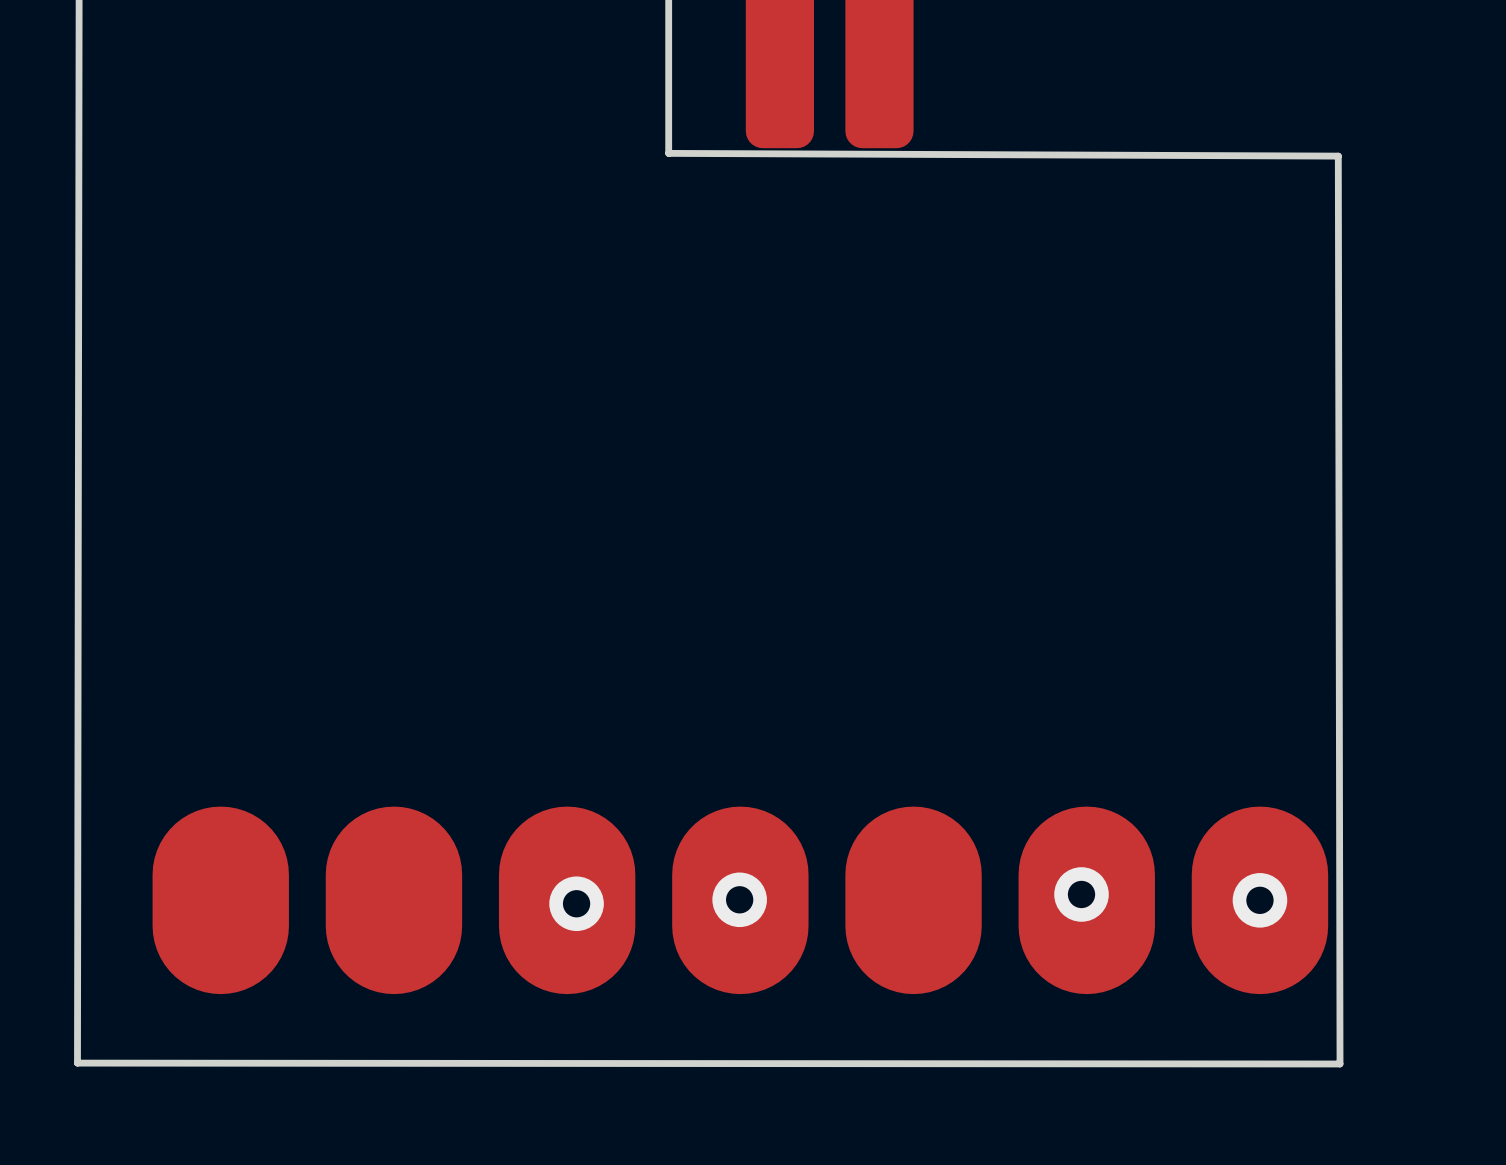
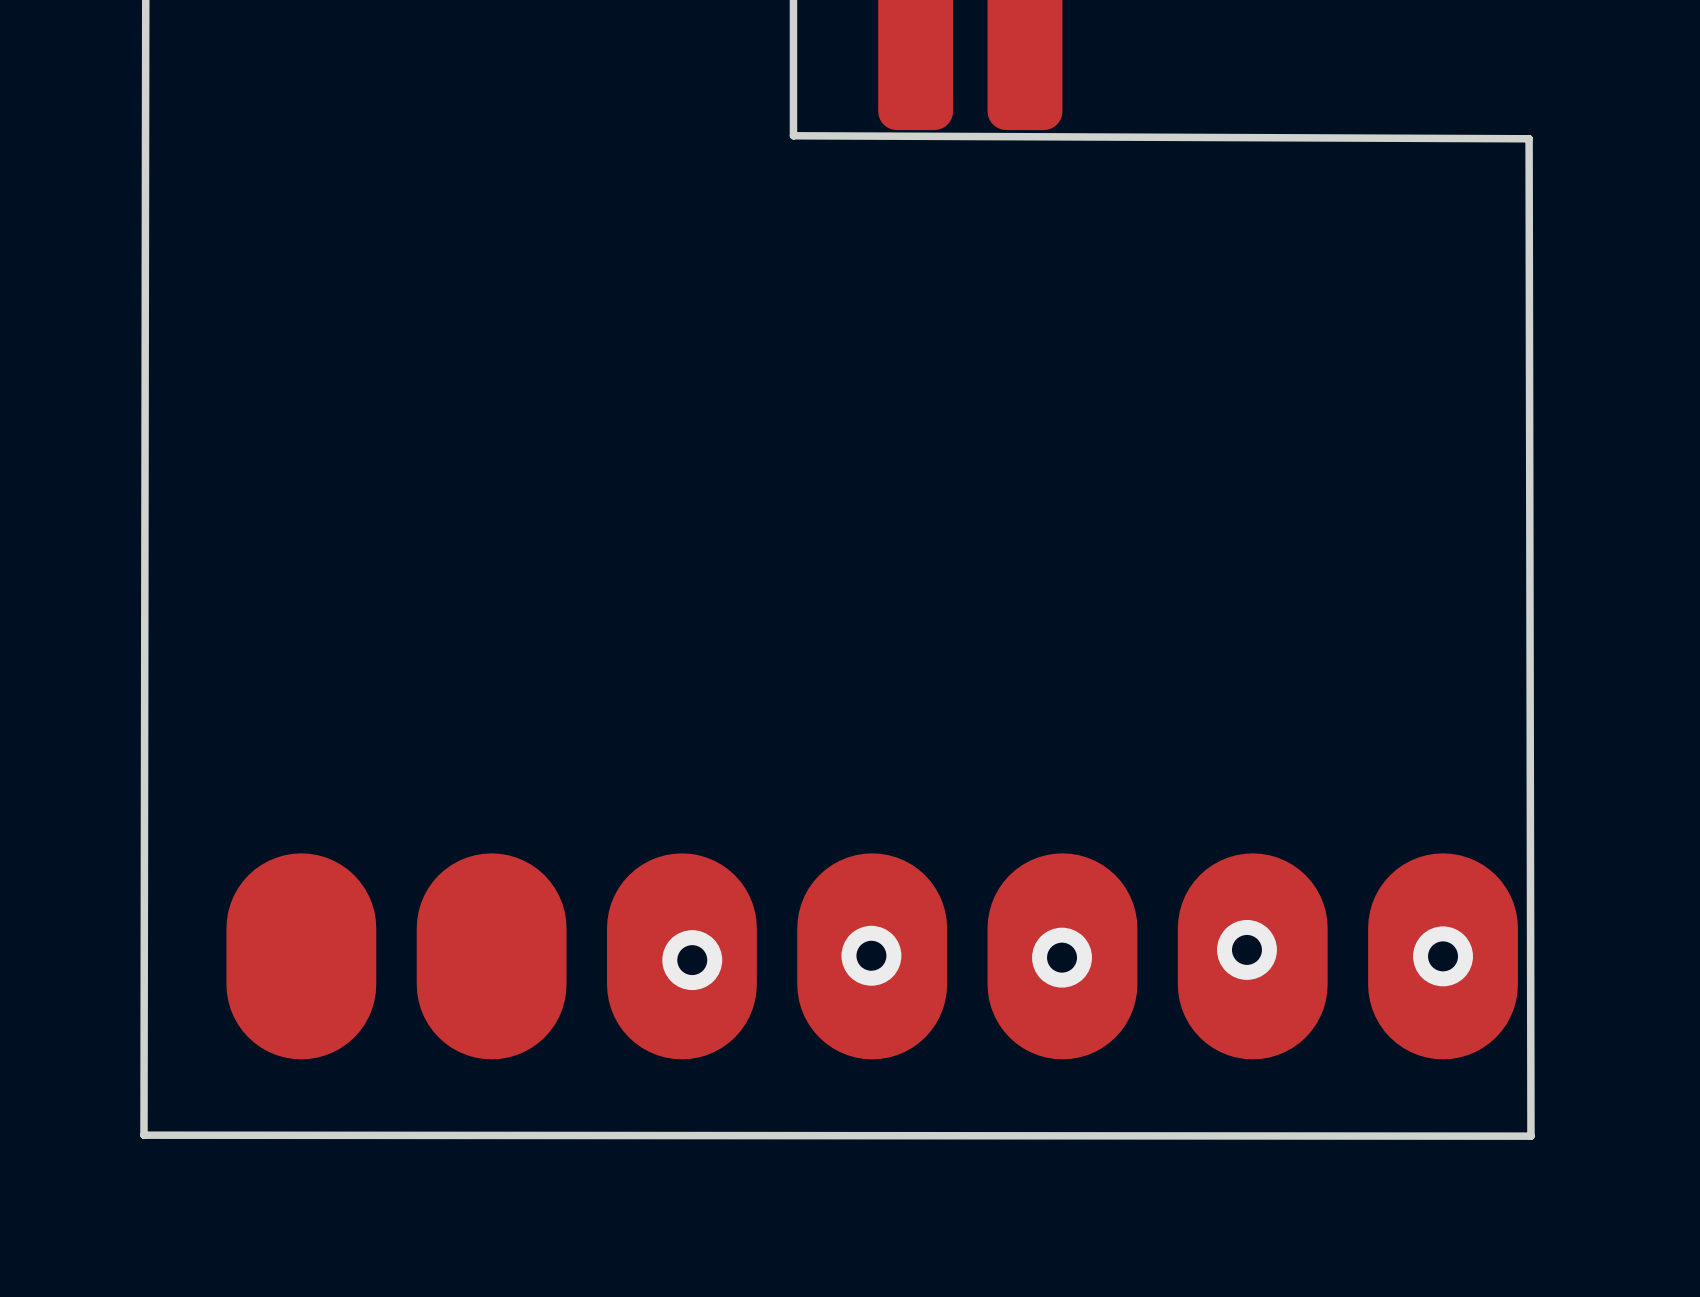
via: none -> (1062, 957)

